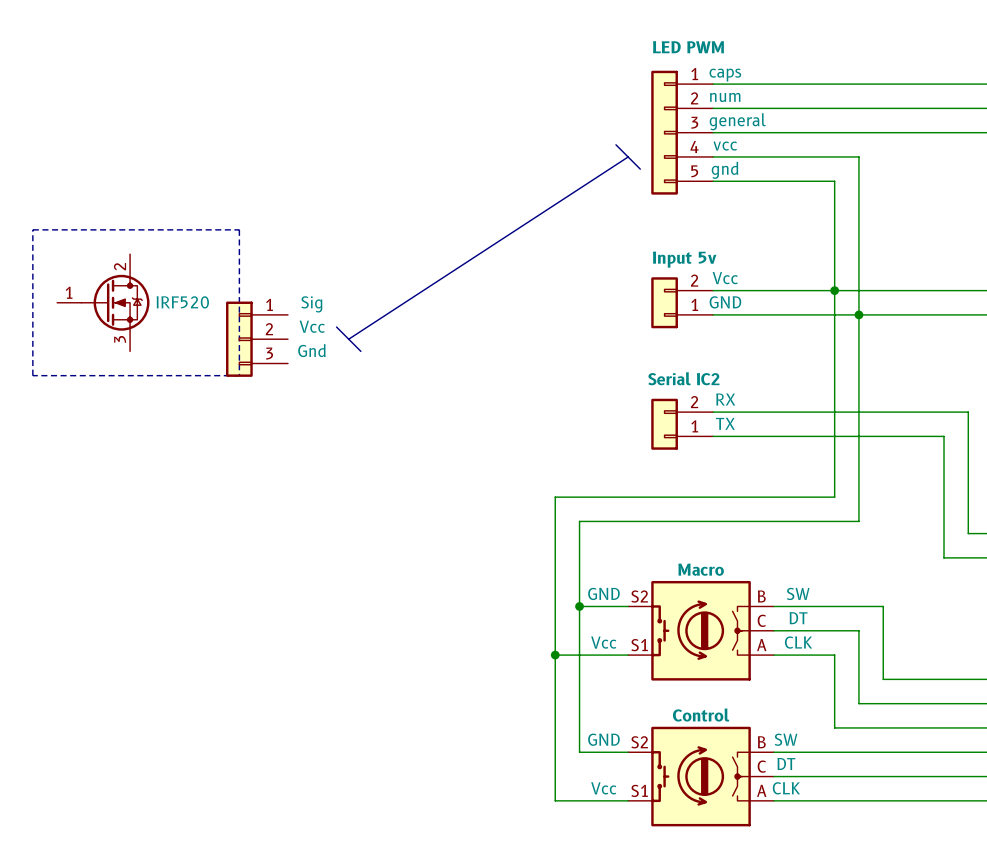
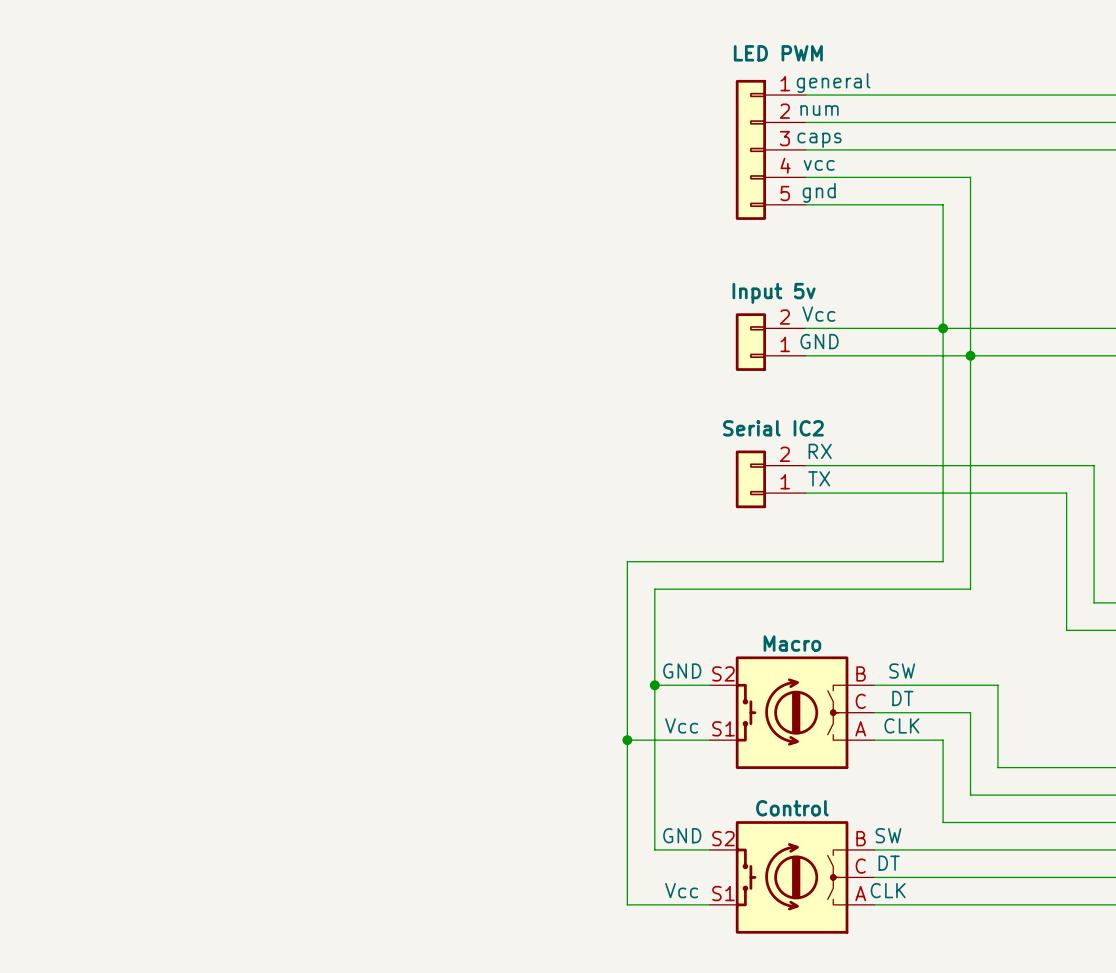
part text position: caps (725, 75) -> caps (819, 140)
part text position: general (737, 121) -> general (833, 83)
bus: (615, 144) (640, 169) -> none
bus: (628, 156) (348, 339) -> none
line: (32, 229) (239, 229) (239, 375) (32, 375) (32, 229) -> none
part: IRF520 (103, 302) -> none
bus: (336, 327) (360, 351) -> none
part: (257, 339) -> none

